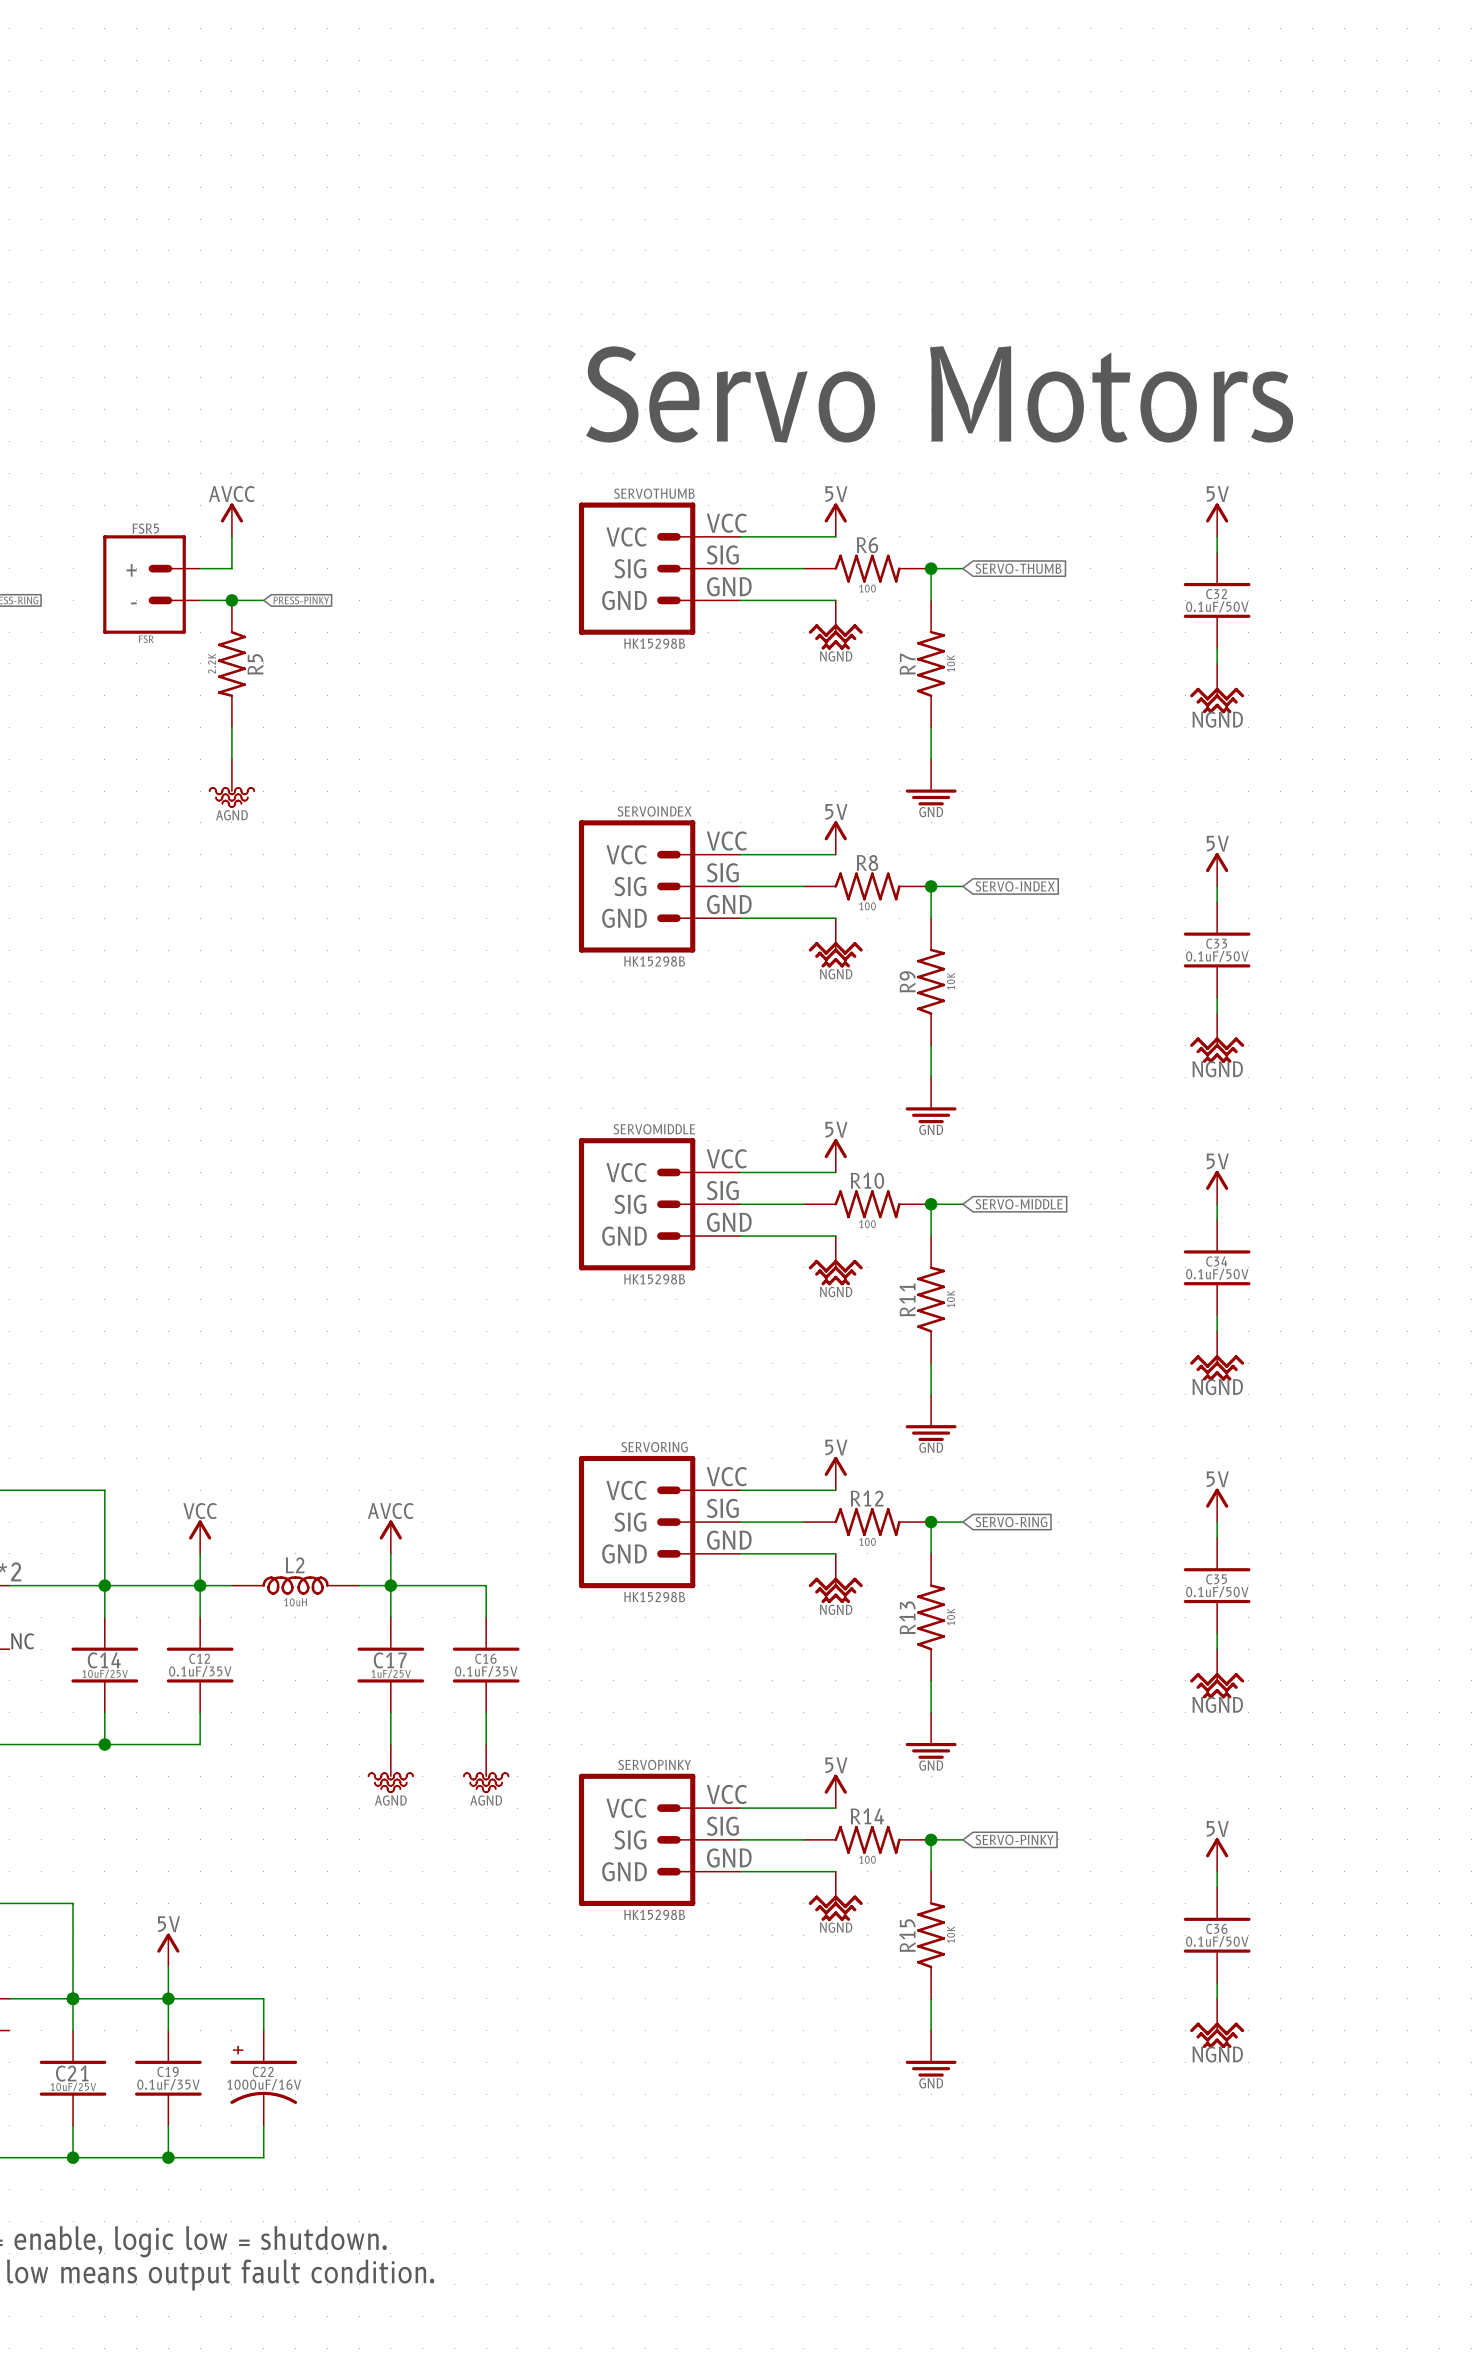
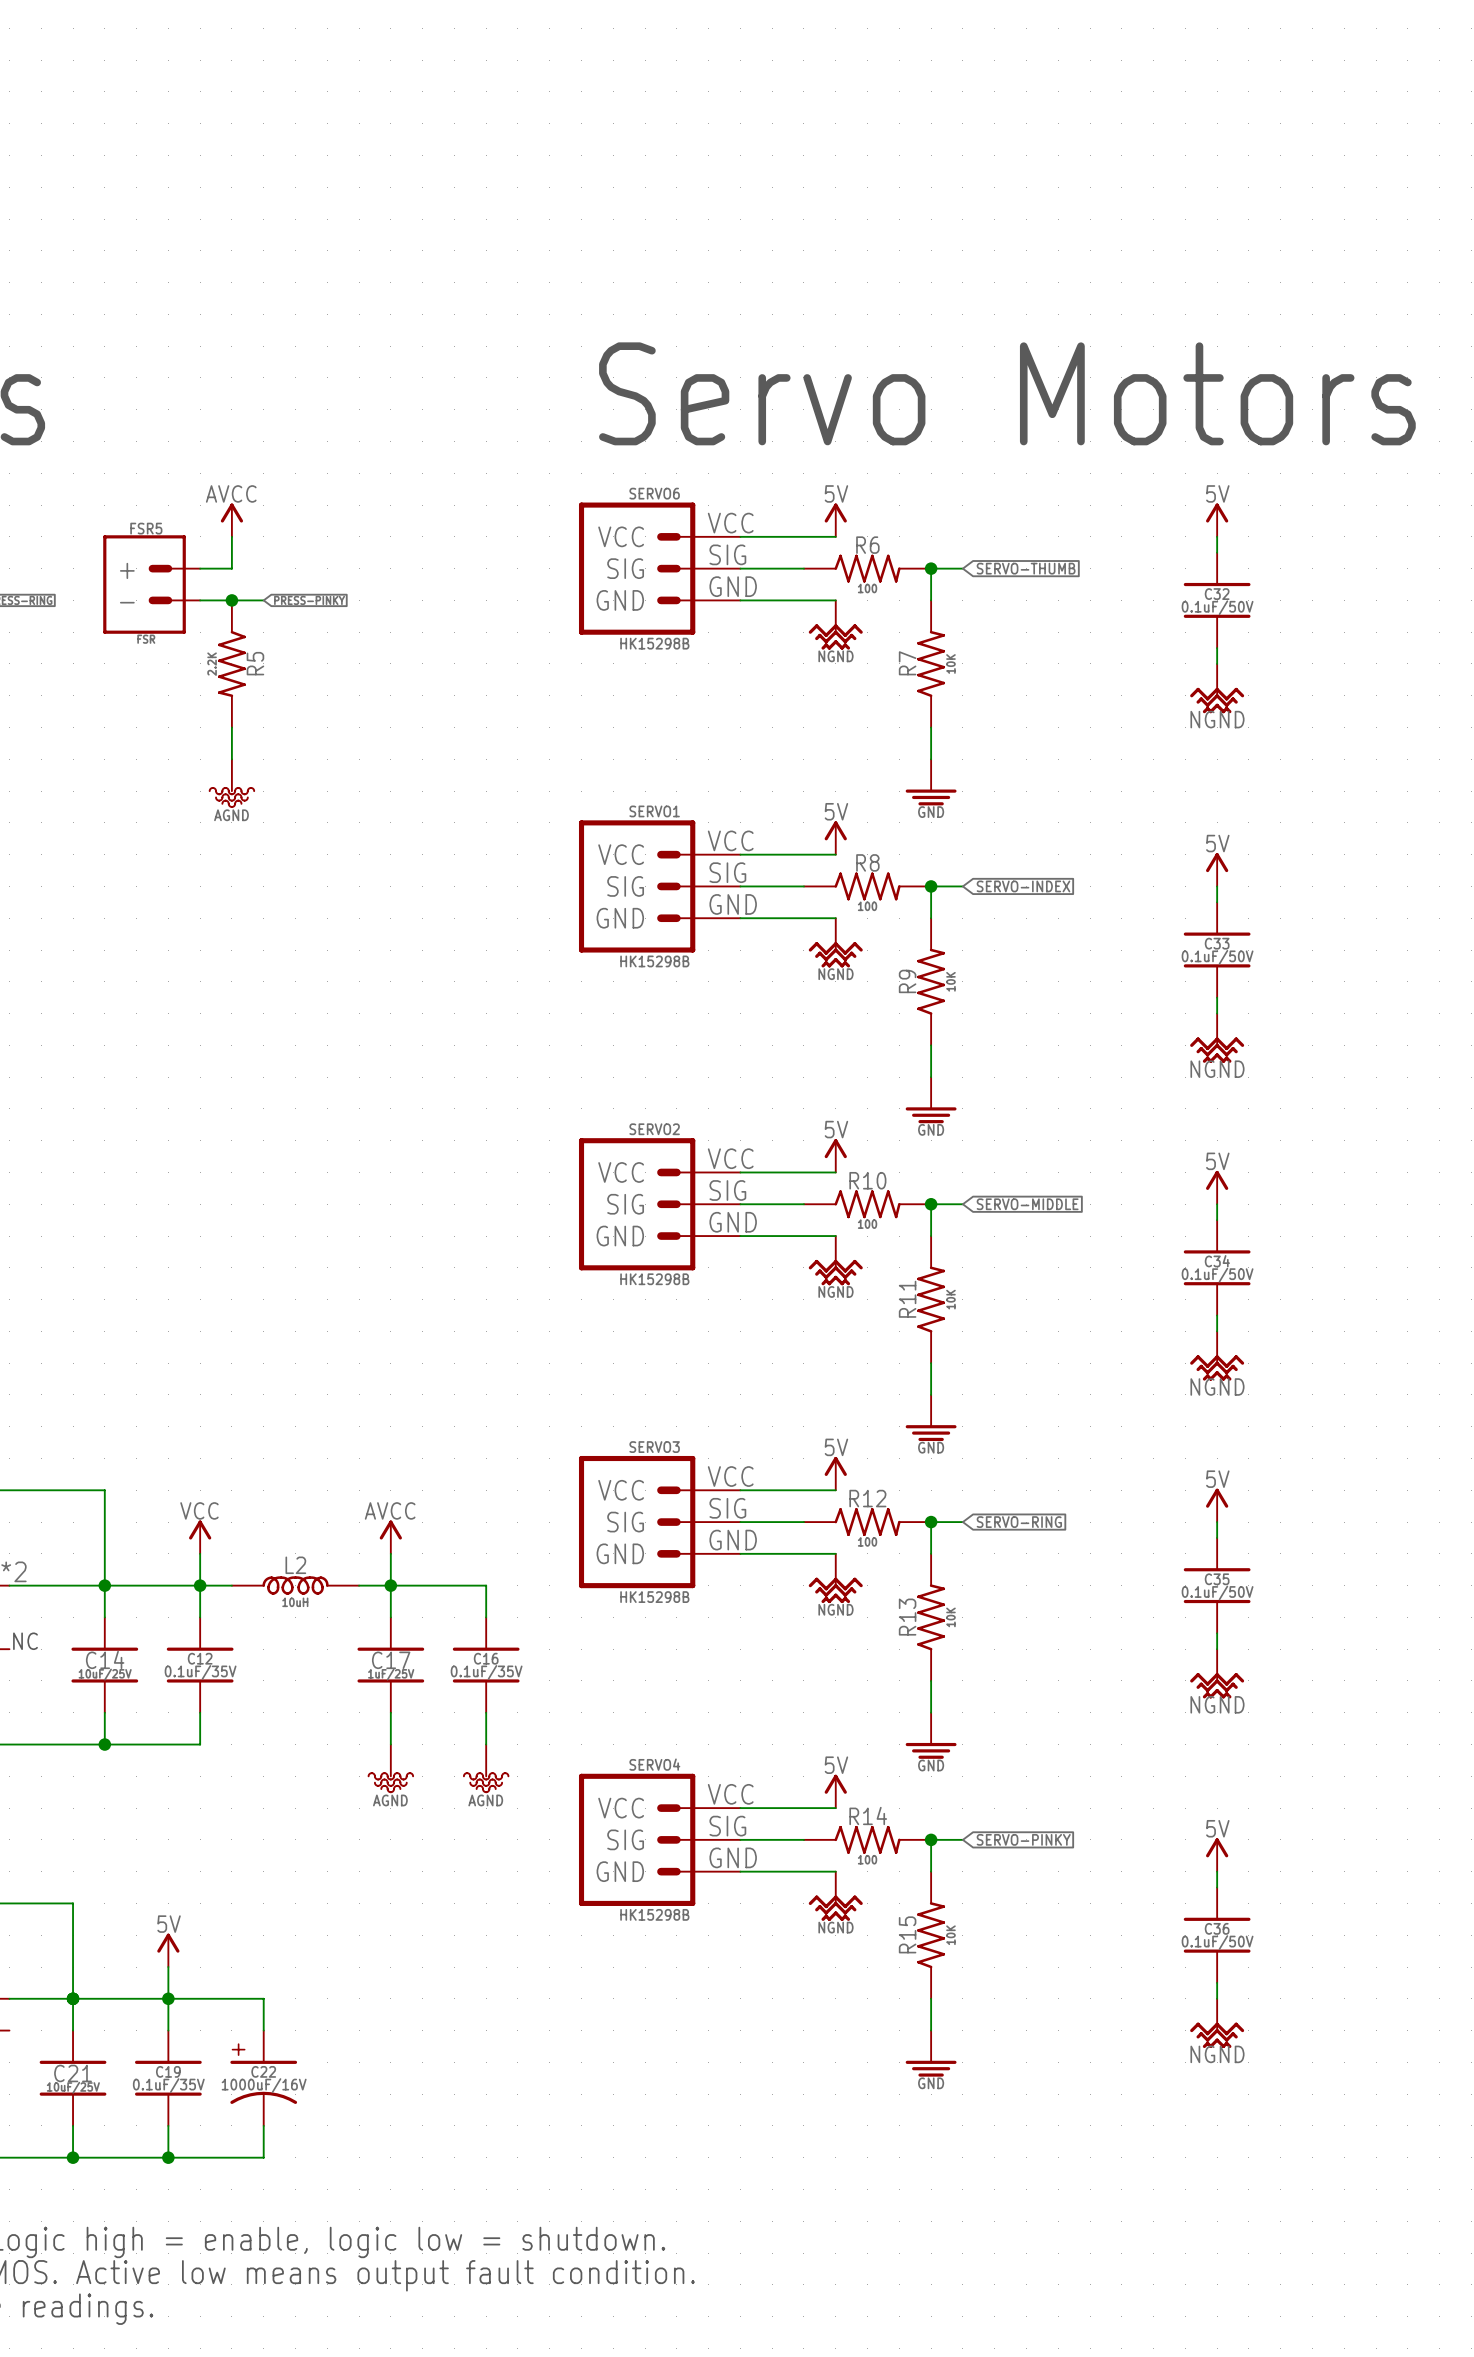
SERVOTHUMB name: SERVOTHUMB (654, 493) -> SERVO6 (654, 493)
SERVOINDEX name: SERVOINDEX (654, 811) -> SERVO1 (654, 811)
SERVOMIDDLE name: SERVOMIDDLE (654, 1129) -> SERVO2 (654, 1129)
SERVORING name: SERVORING (654, 1447) -> SERVO3 (654, 1447)
SERVOPINKY name: SERVOPINKY (654, 1764) -> SERVO4 (654, 1764)

